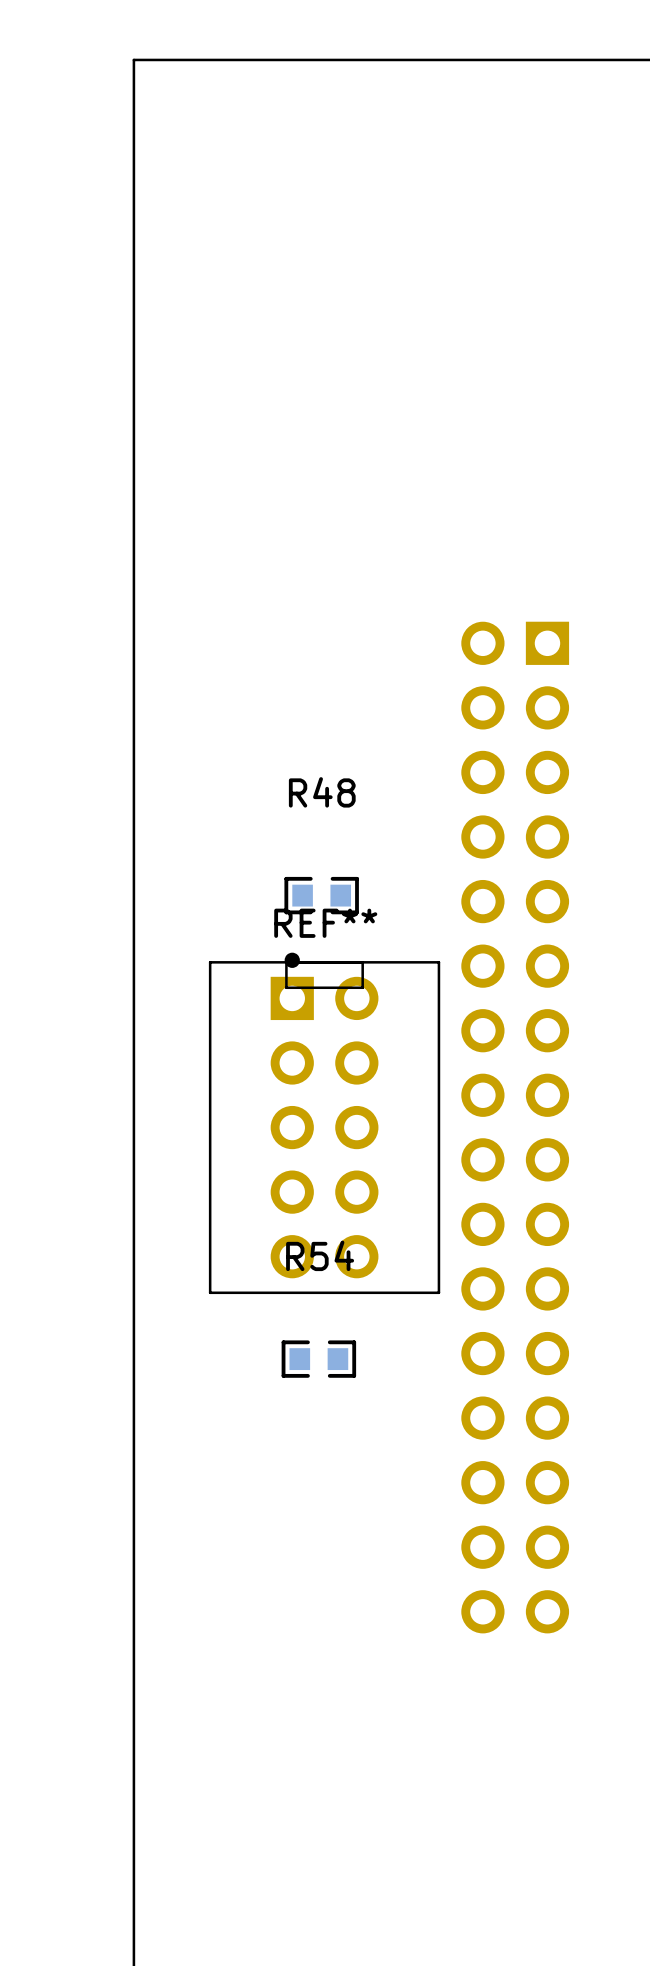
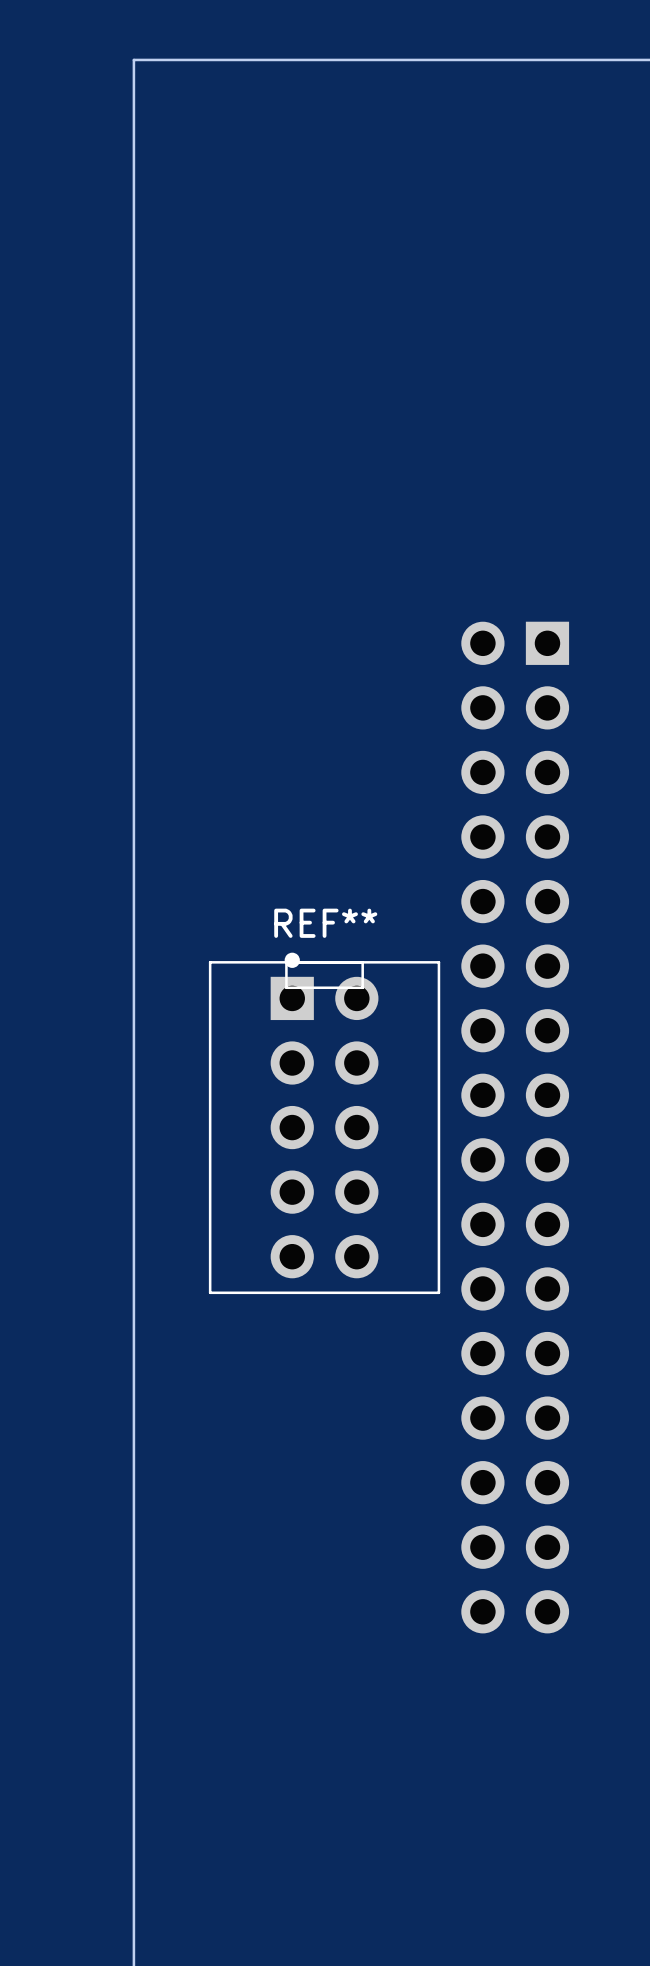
R48: (321, 895) -> none
R54: (318, 1359) -> none

